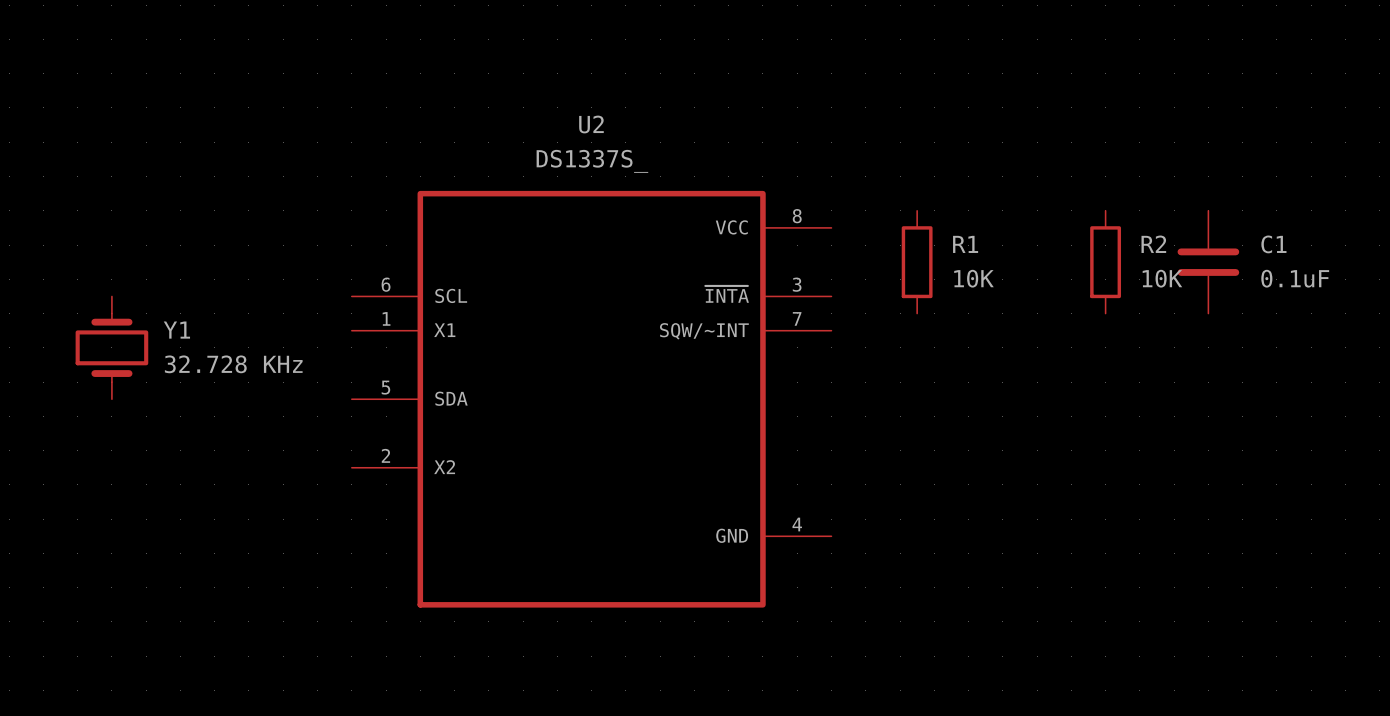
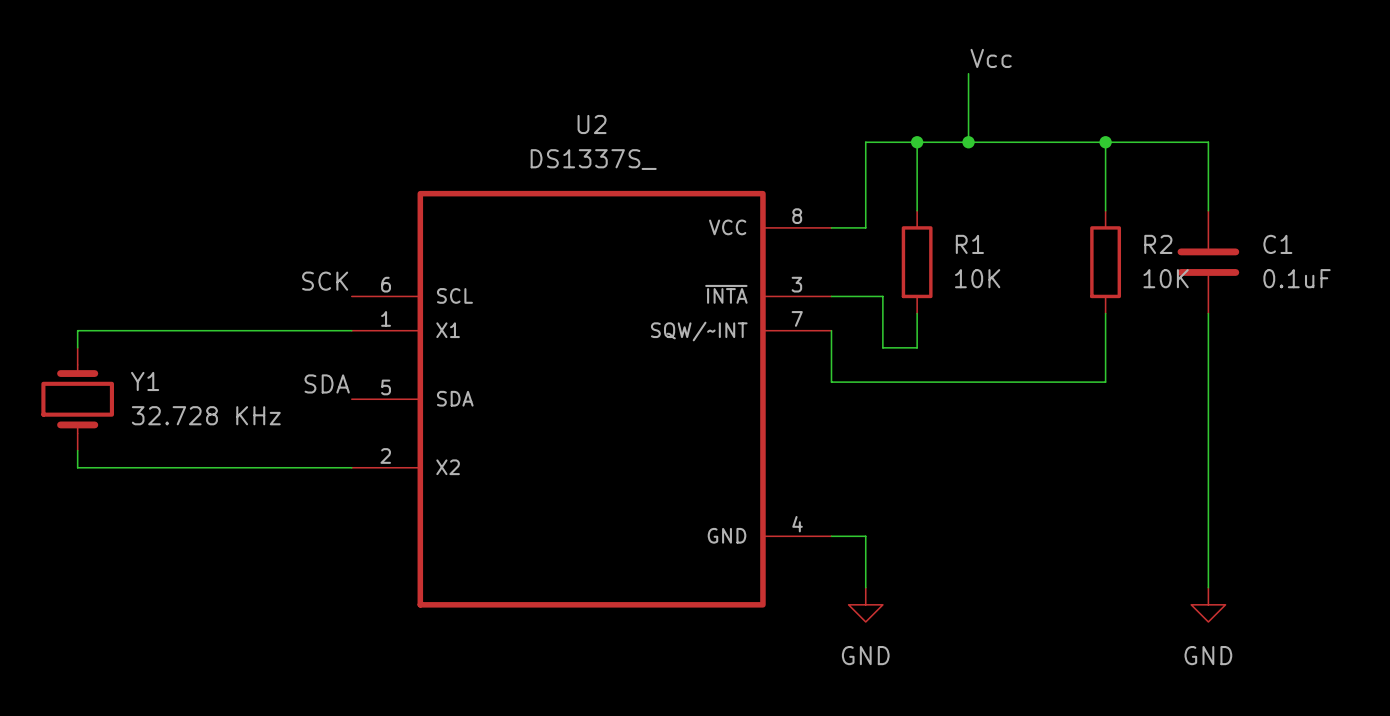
label: none -> Vcc (991, 58)
wire: none -> (968, 73) (968, 142)
wire: none -> (917, 142) (917, 210)
junction: none -> (917, 142)
junction: none -> (968, 142)
wire: none -> (1105, 142) (1105, 210)
junction: none -> (1105, 142)
wire: none -> (1208, 210) (1208, 142) (865, 142) (865, 227) (831, 227)
label: none -> SCK (325, 281)
wire: none -> (831, 296) (882, 296) (882, 347) (917, 347) (917, 313)
wire: none -> (1105, 313) (1105, 382) (831, 382) (831, 330)
wire: none -> (1208, 313) (1208, 587)
wire: none -> (351, 330) (77, 330) (77, 347)
Y1 position: (111, 347) -> (77, 399)
label: none -> SDA (327, 383)
wire: none -> (77, 450) (77, 467) (351, 467)
wire: none -> (831, 536) (865, 536) (865, 587)
power symbol: none -> GND (865, 604)
power symbol: none -> GND (1208, 604)

